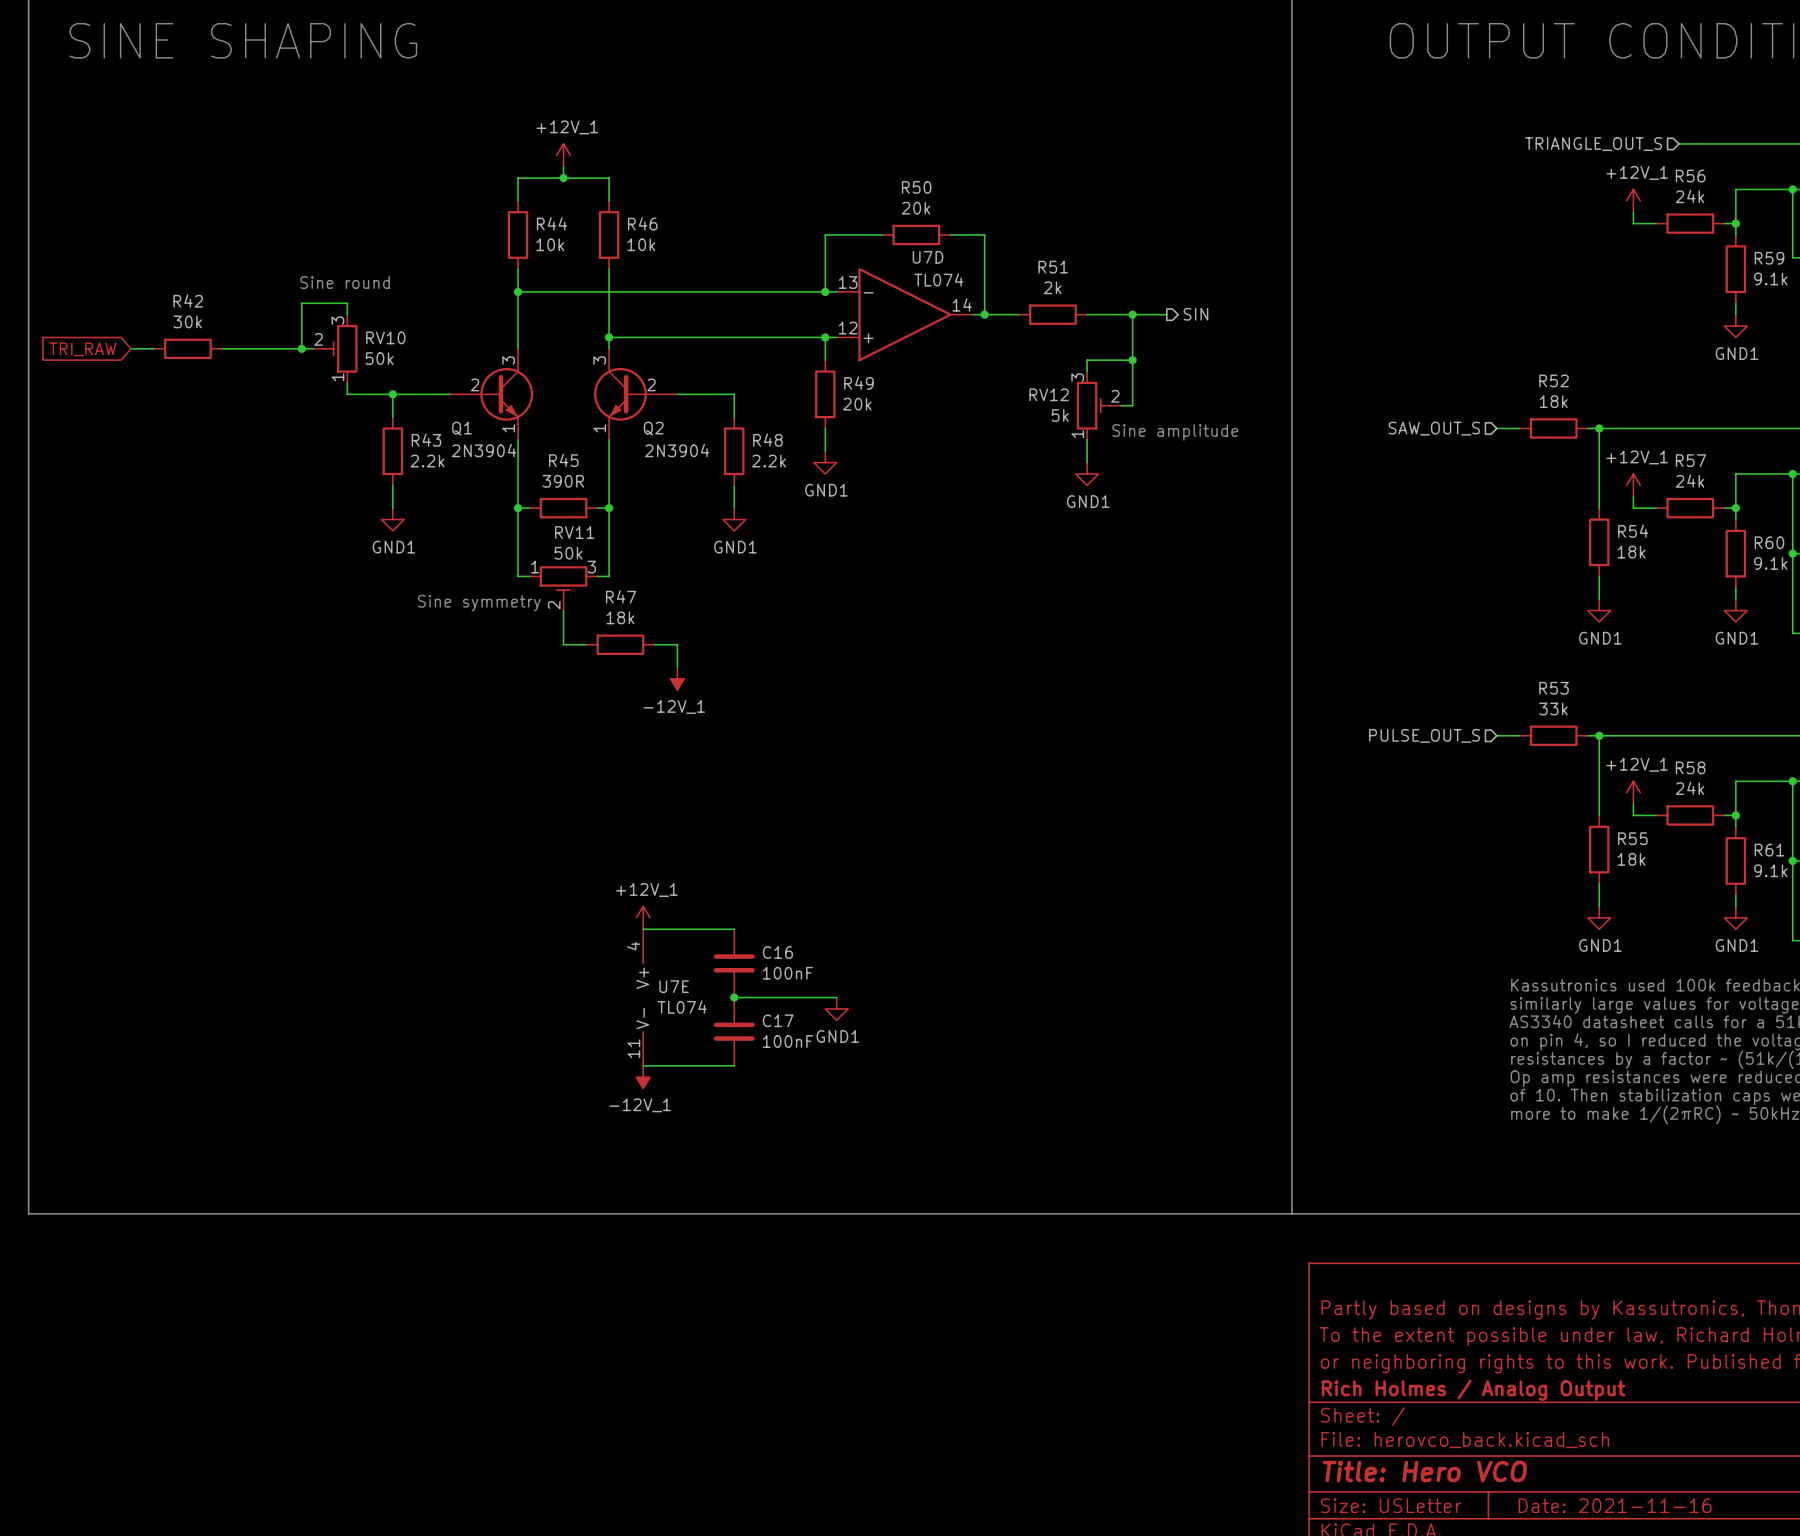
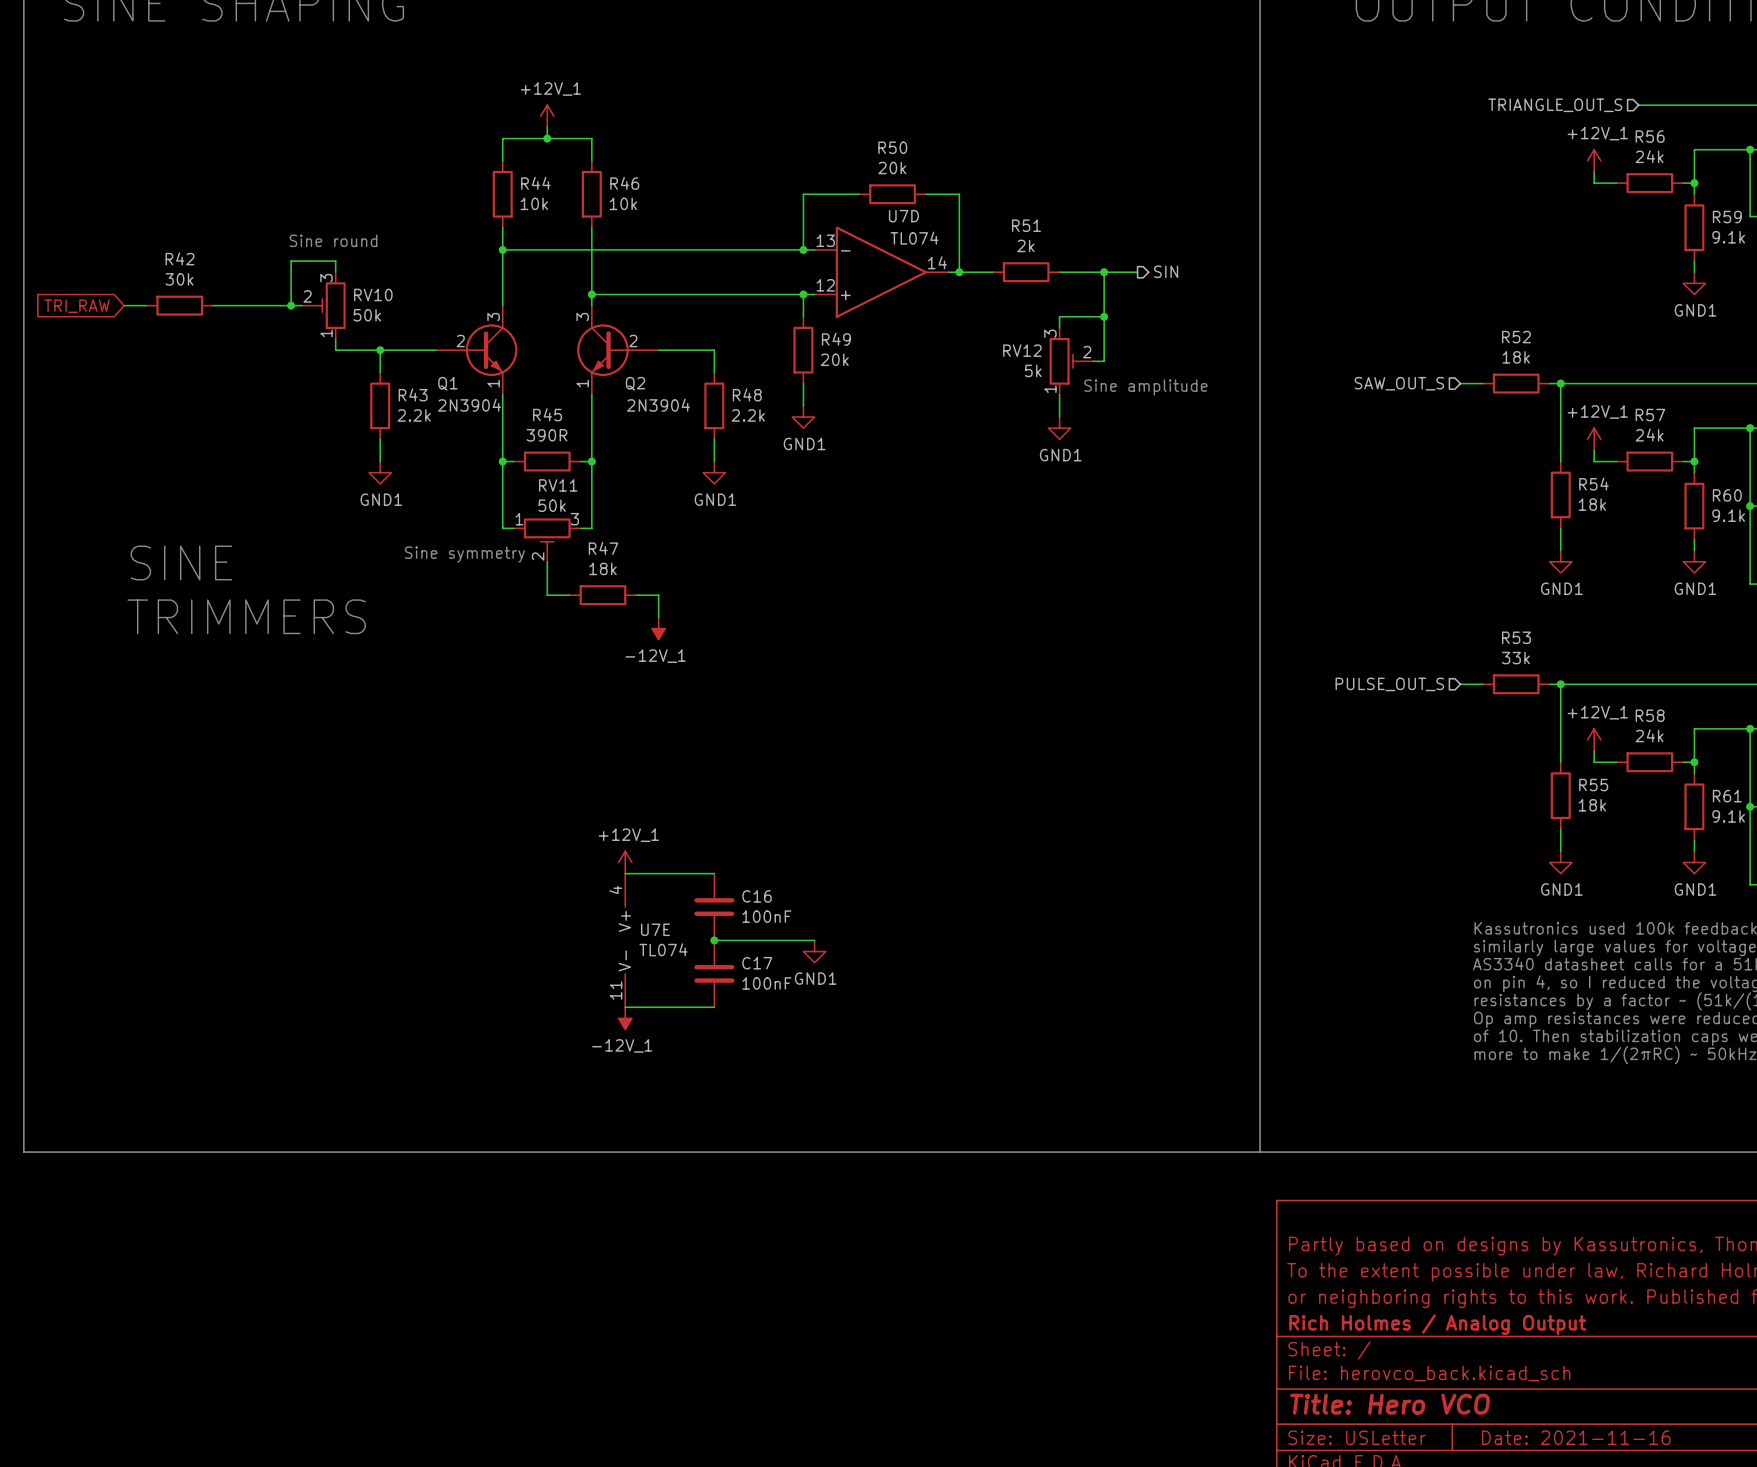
text: none -> SINE (181, 562)
text: none -> TRIMMERS (246, 616)

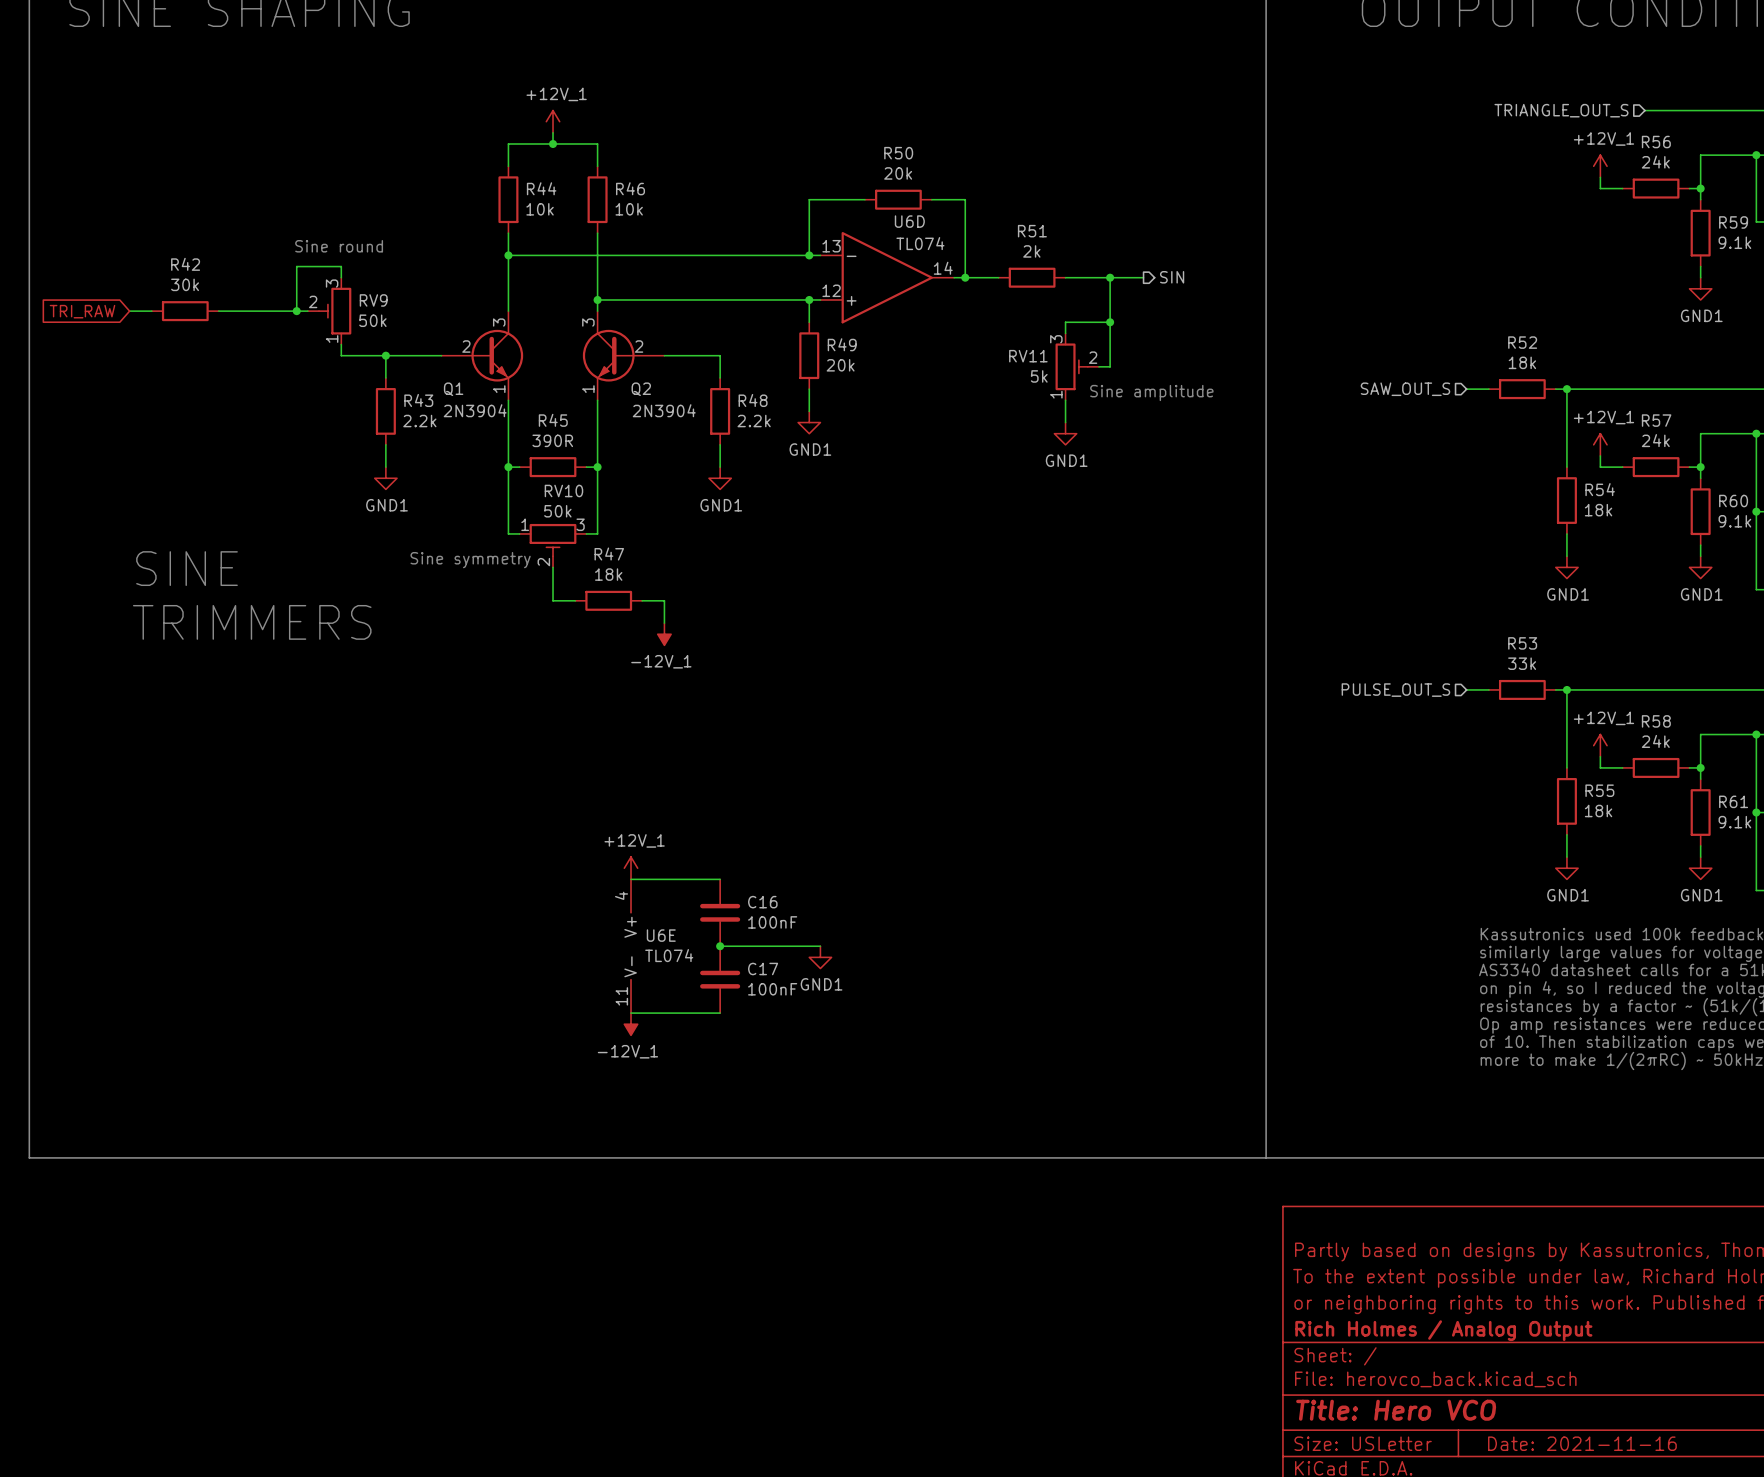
U7D name: U7D (903, 216) -> U6D (909, 221)
RV10 name: RV10 (373, 294) -> RV9 (373, 300)
RV12 name: RV12 (1022, 350) -> RV11 (1028, 356)
RV11 name: RV11 (558, 485) -> RV10 (563, 490)
U7E name: U7E (655, 929) -> U6E (661, 935)

